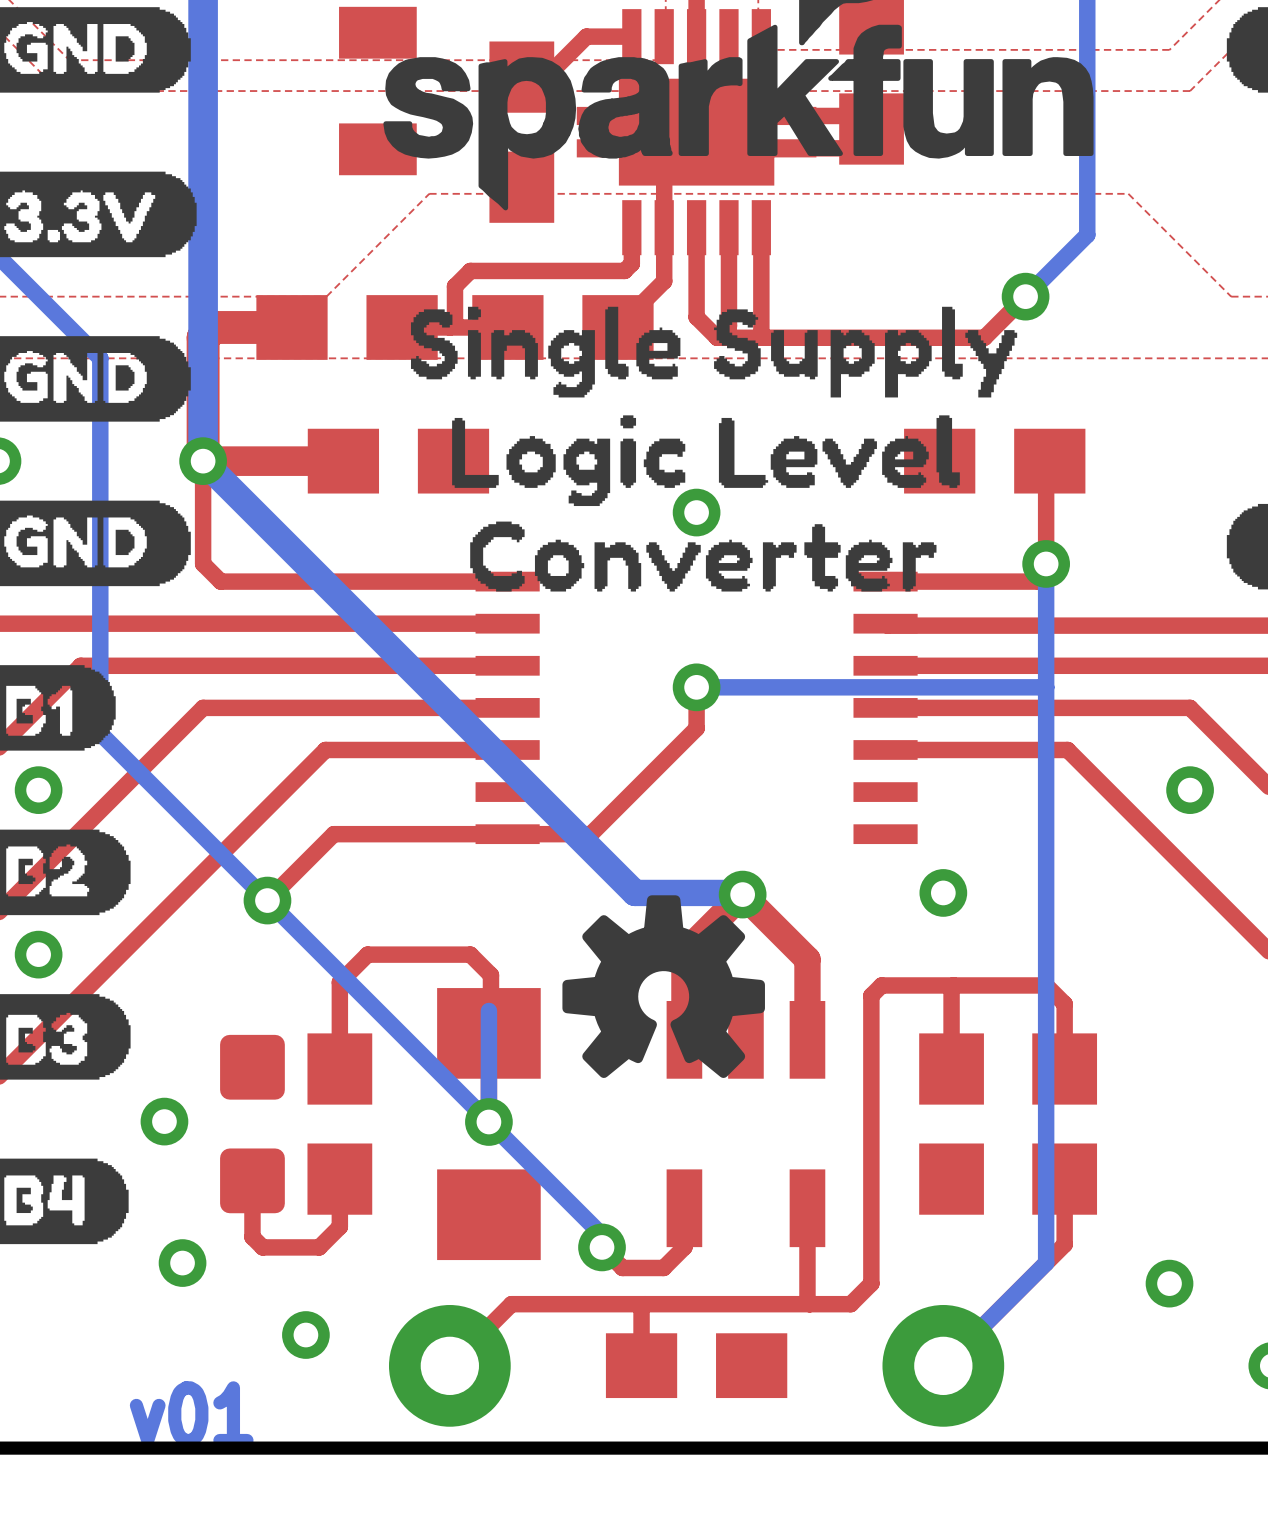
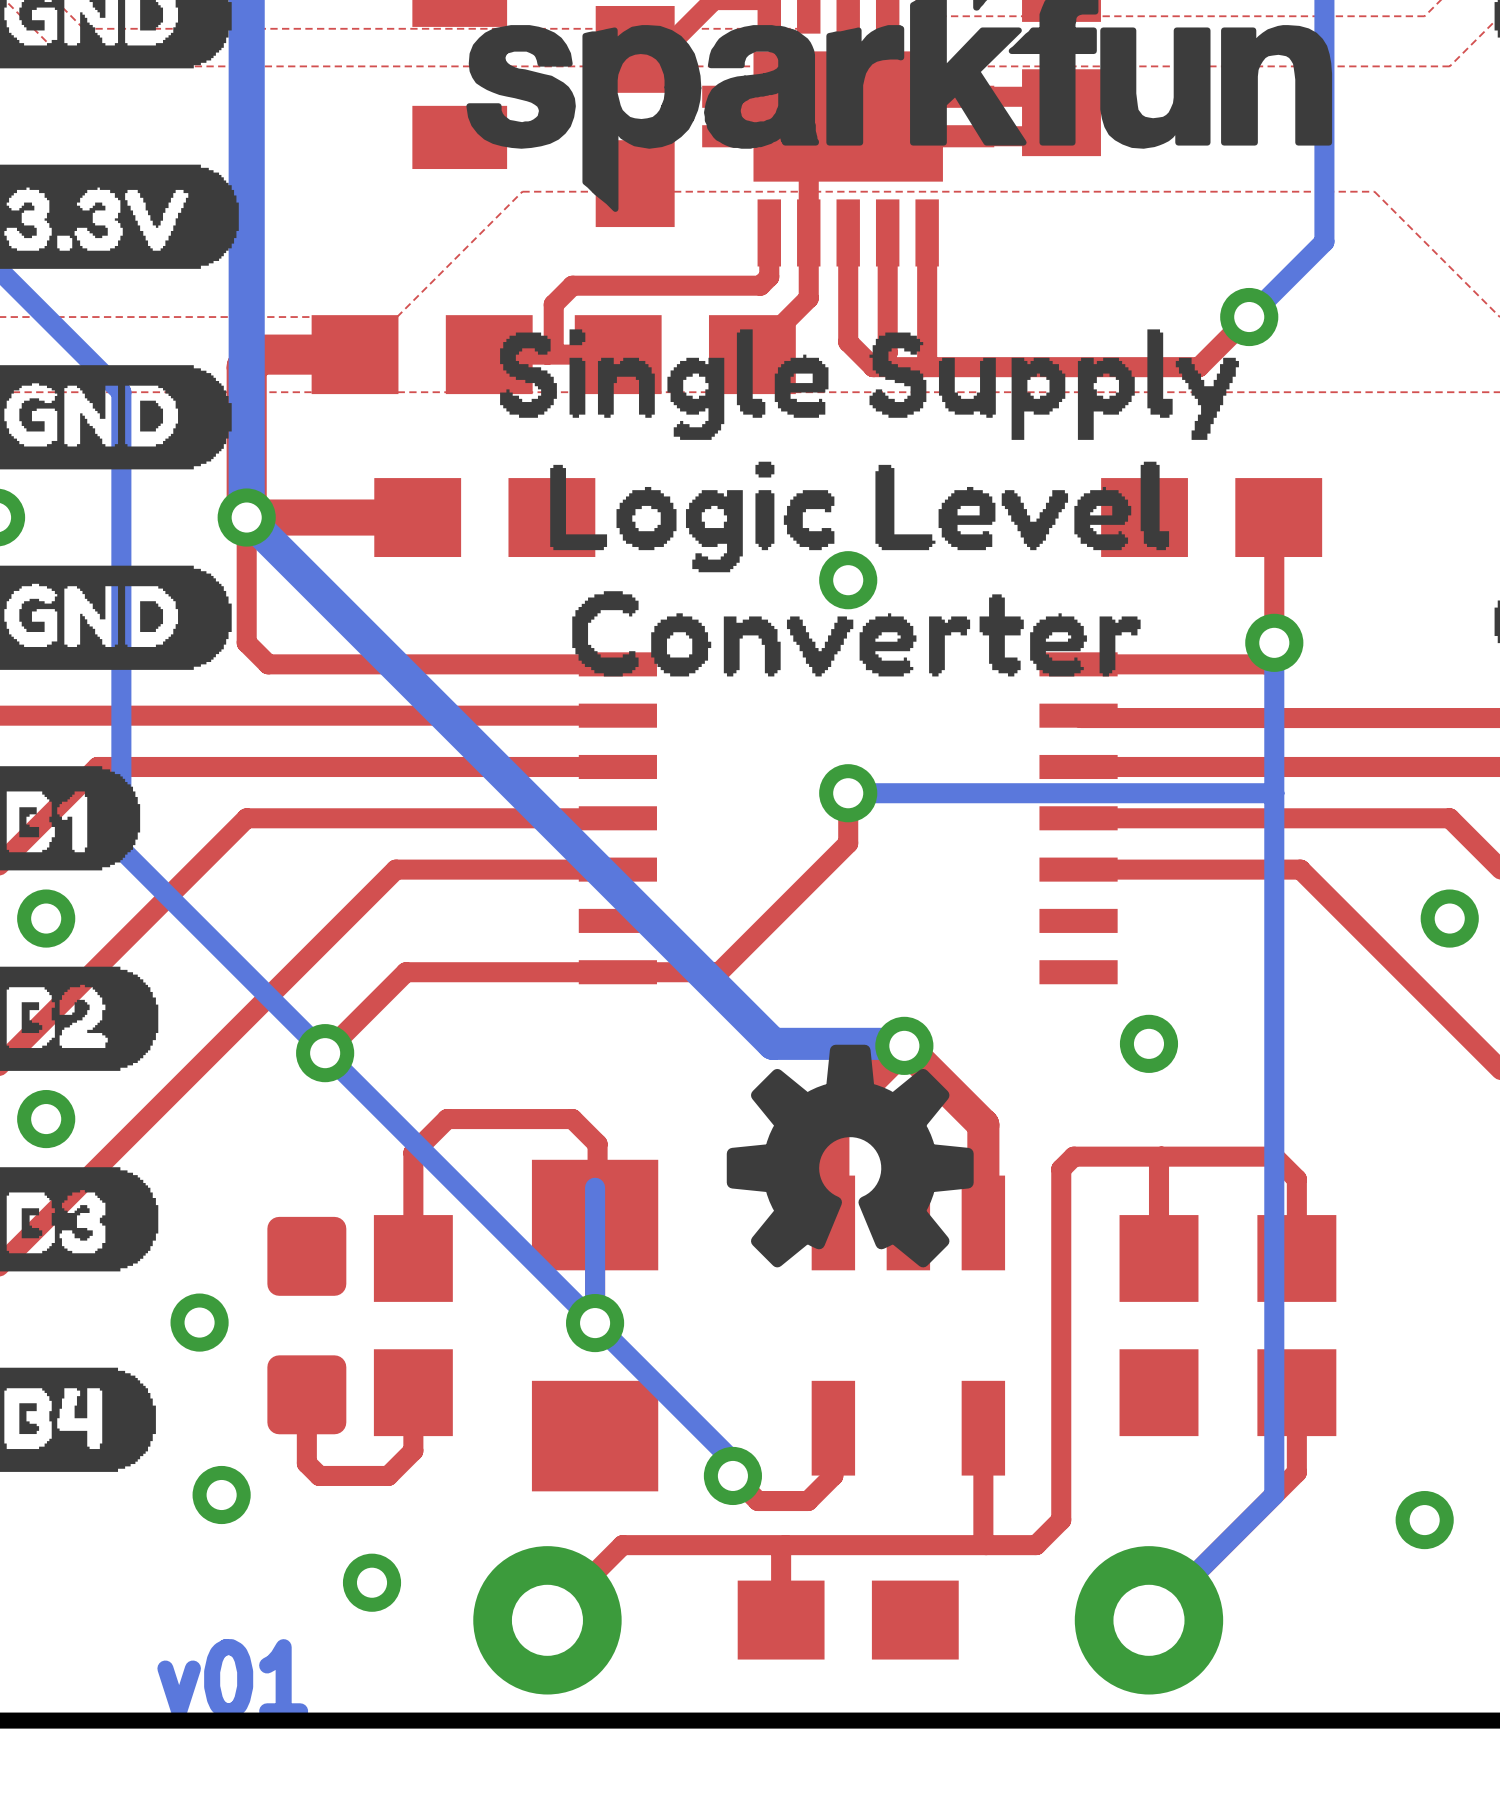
drawing position: (663, 986) -> (850, 1156)

